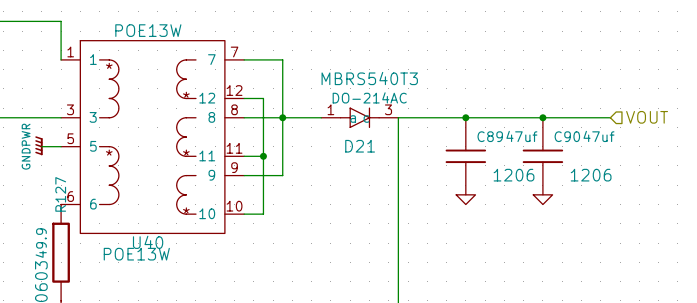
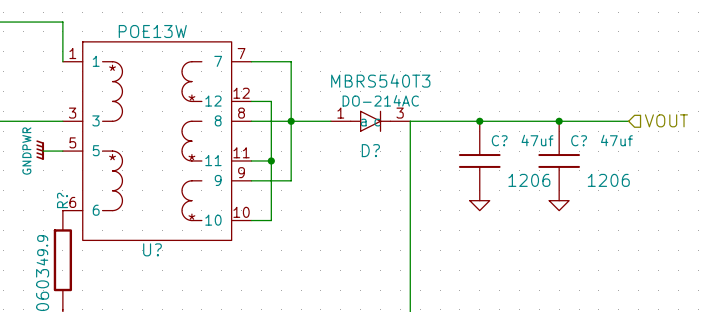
C89 name: C89 (490, 136) -> C? (499, 140)
C90 name: C90 (567, 136) -> C? (579, 140)
D21 name: D21 (360, 146) -> D? (370, 150)
R127 name: R127 (60, 194) -> R? (62, 200)
U40 name: U40 (148, 242) -> U? (152, 249)
U40 text: POE13W (136, 254) -> none

